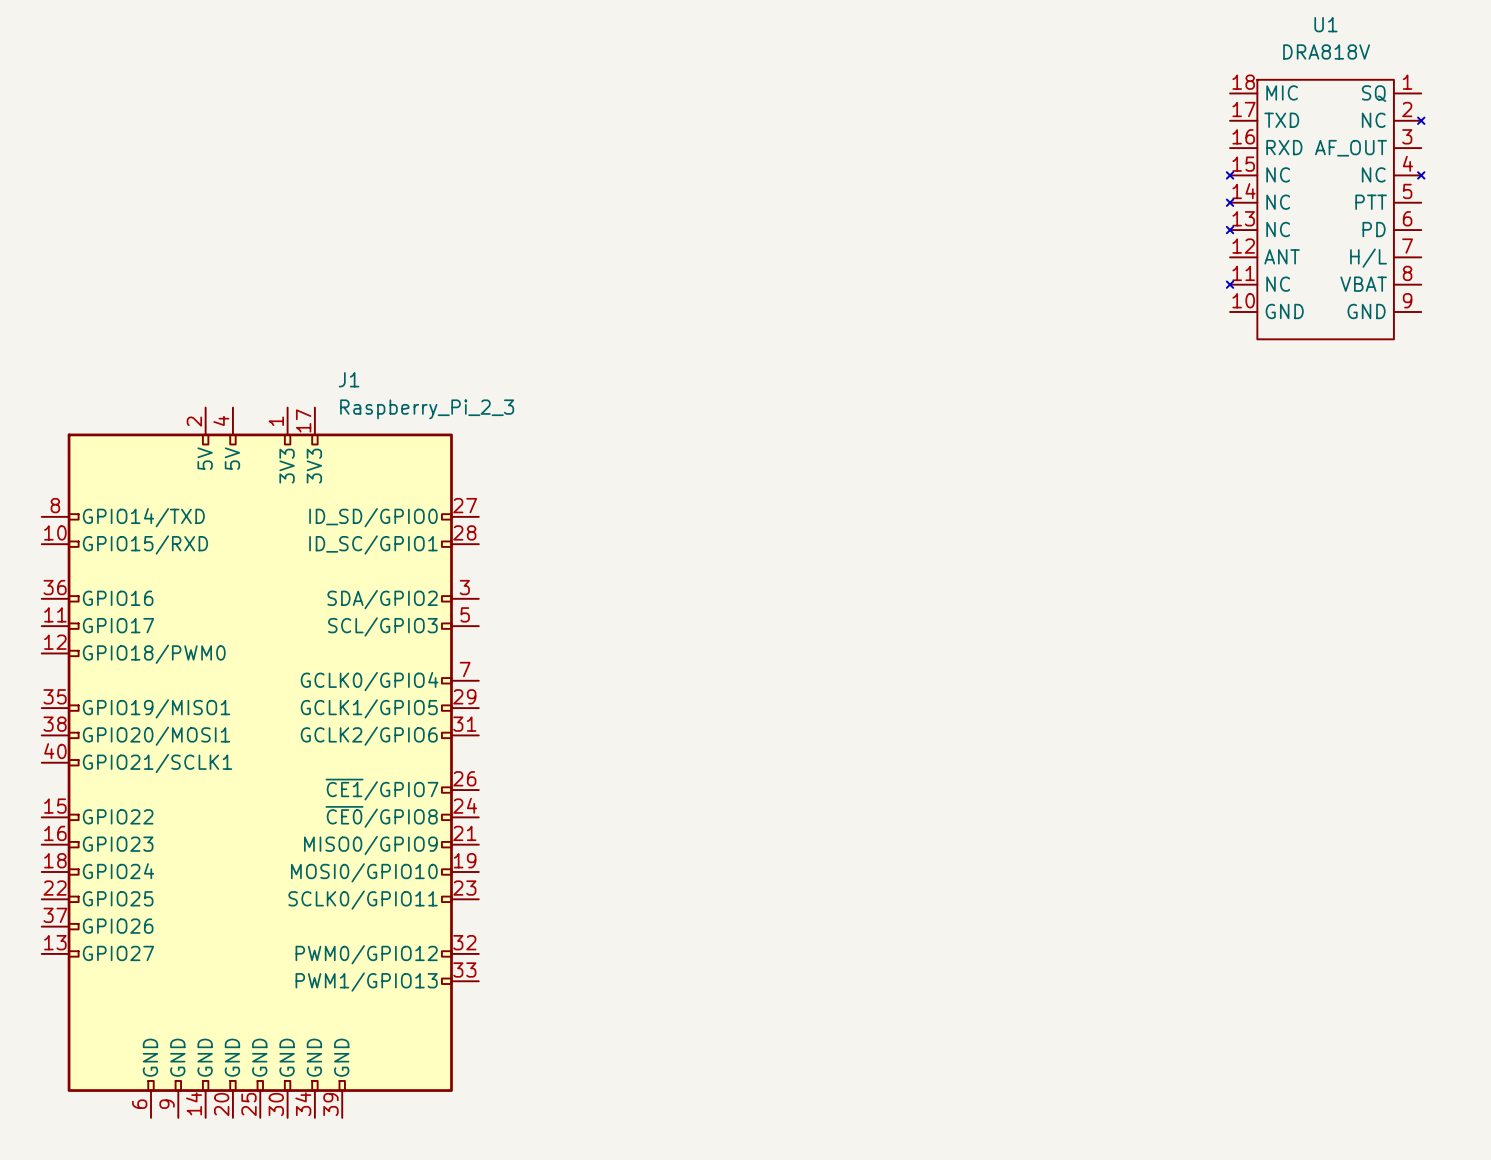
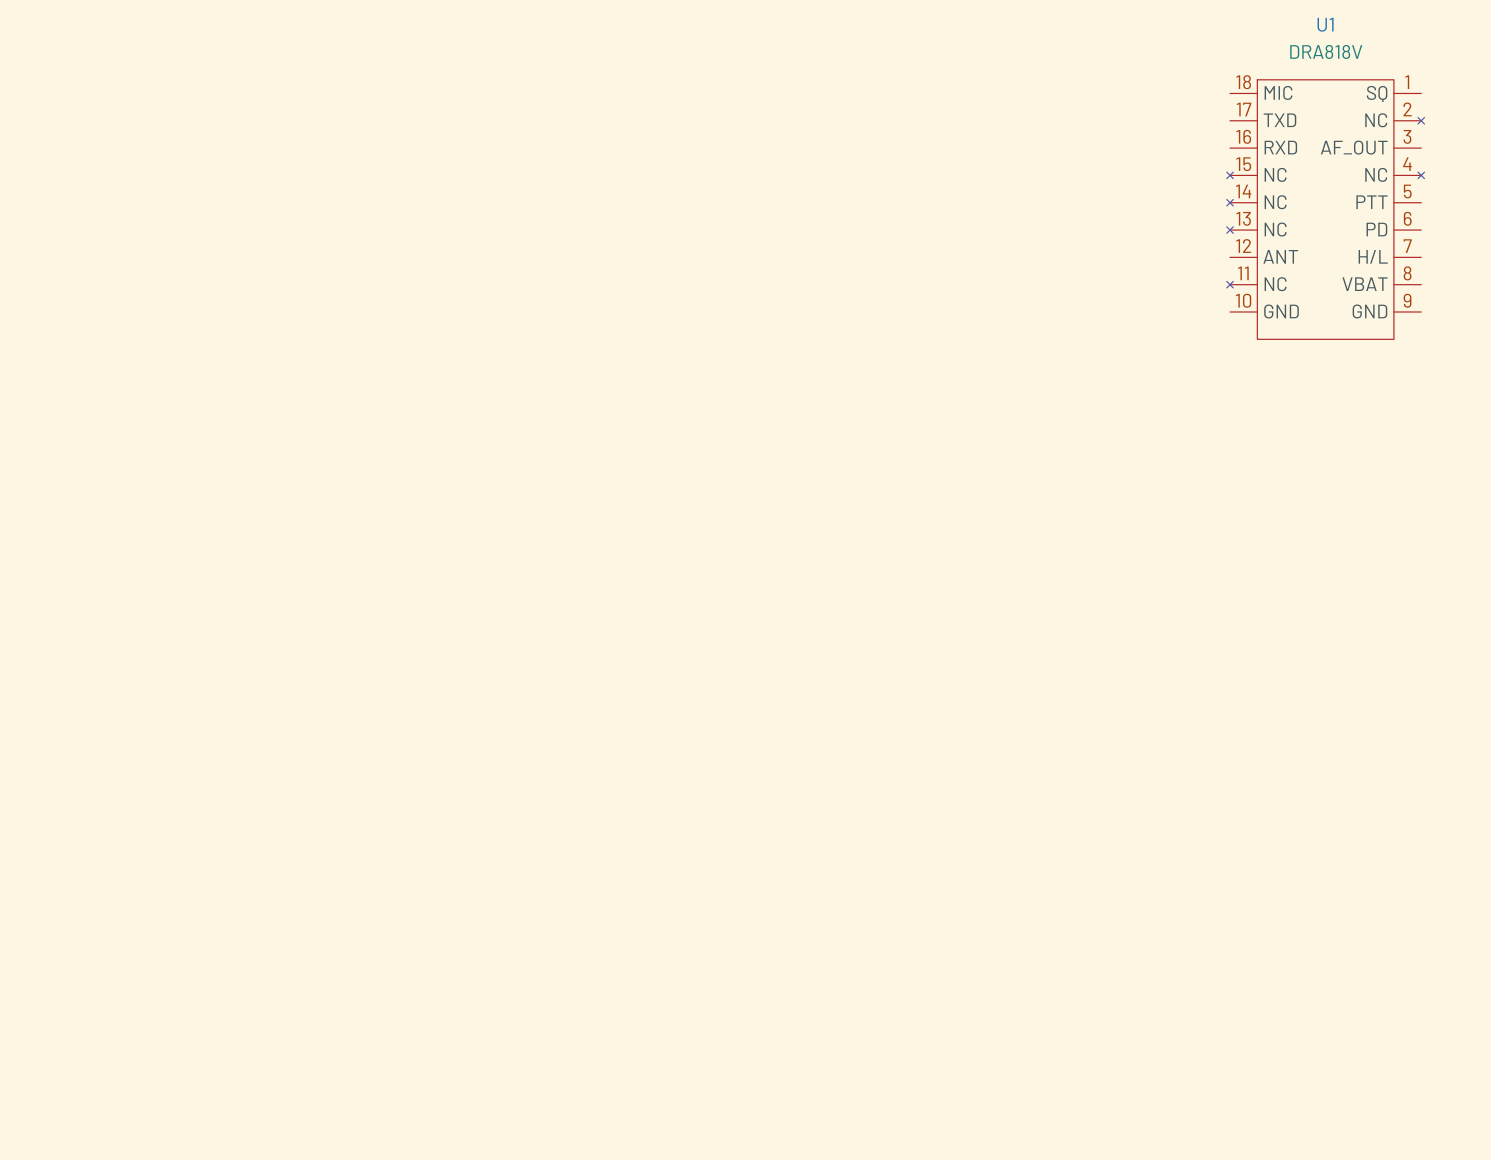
J1: Raspberry_Pi_2_3 (260, 762) -> none

